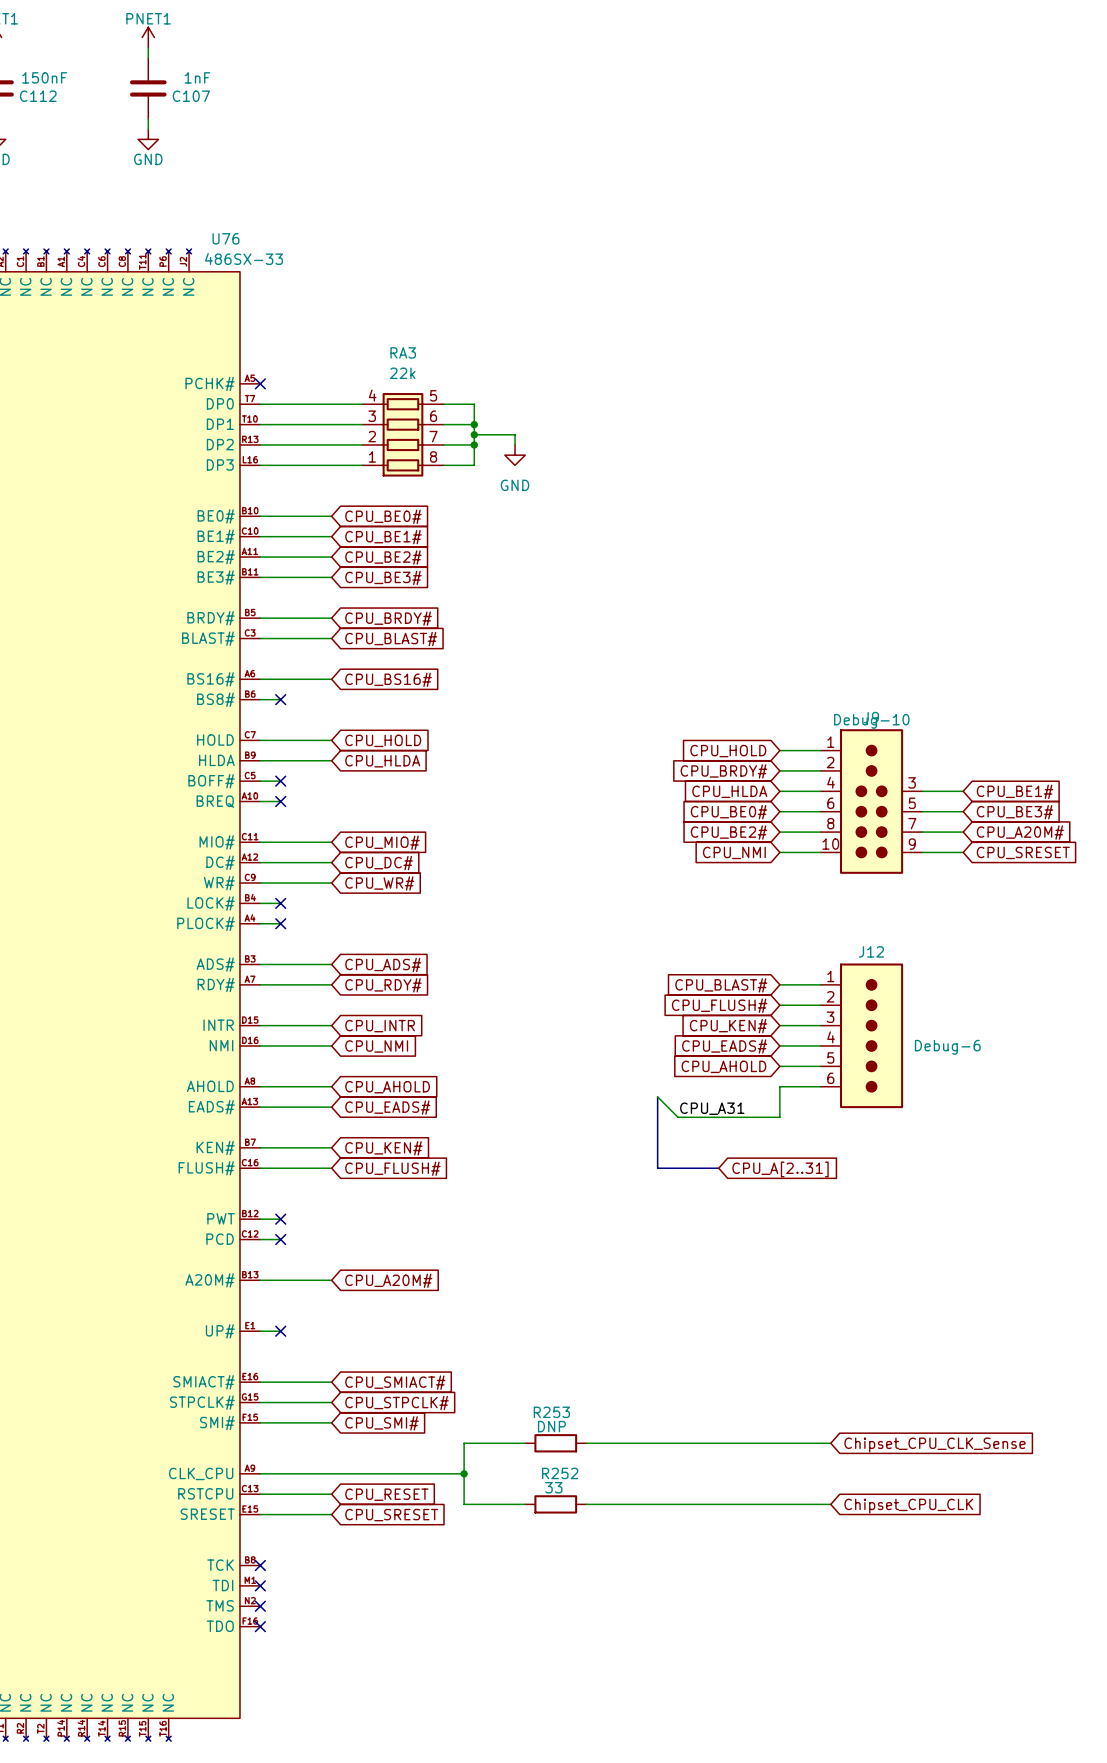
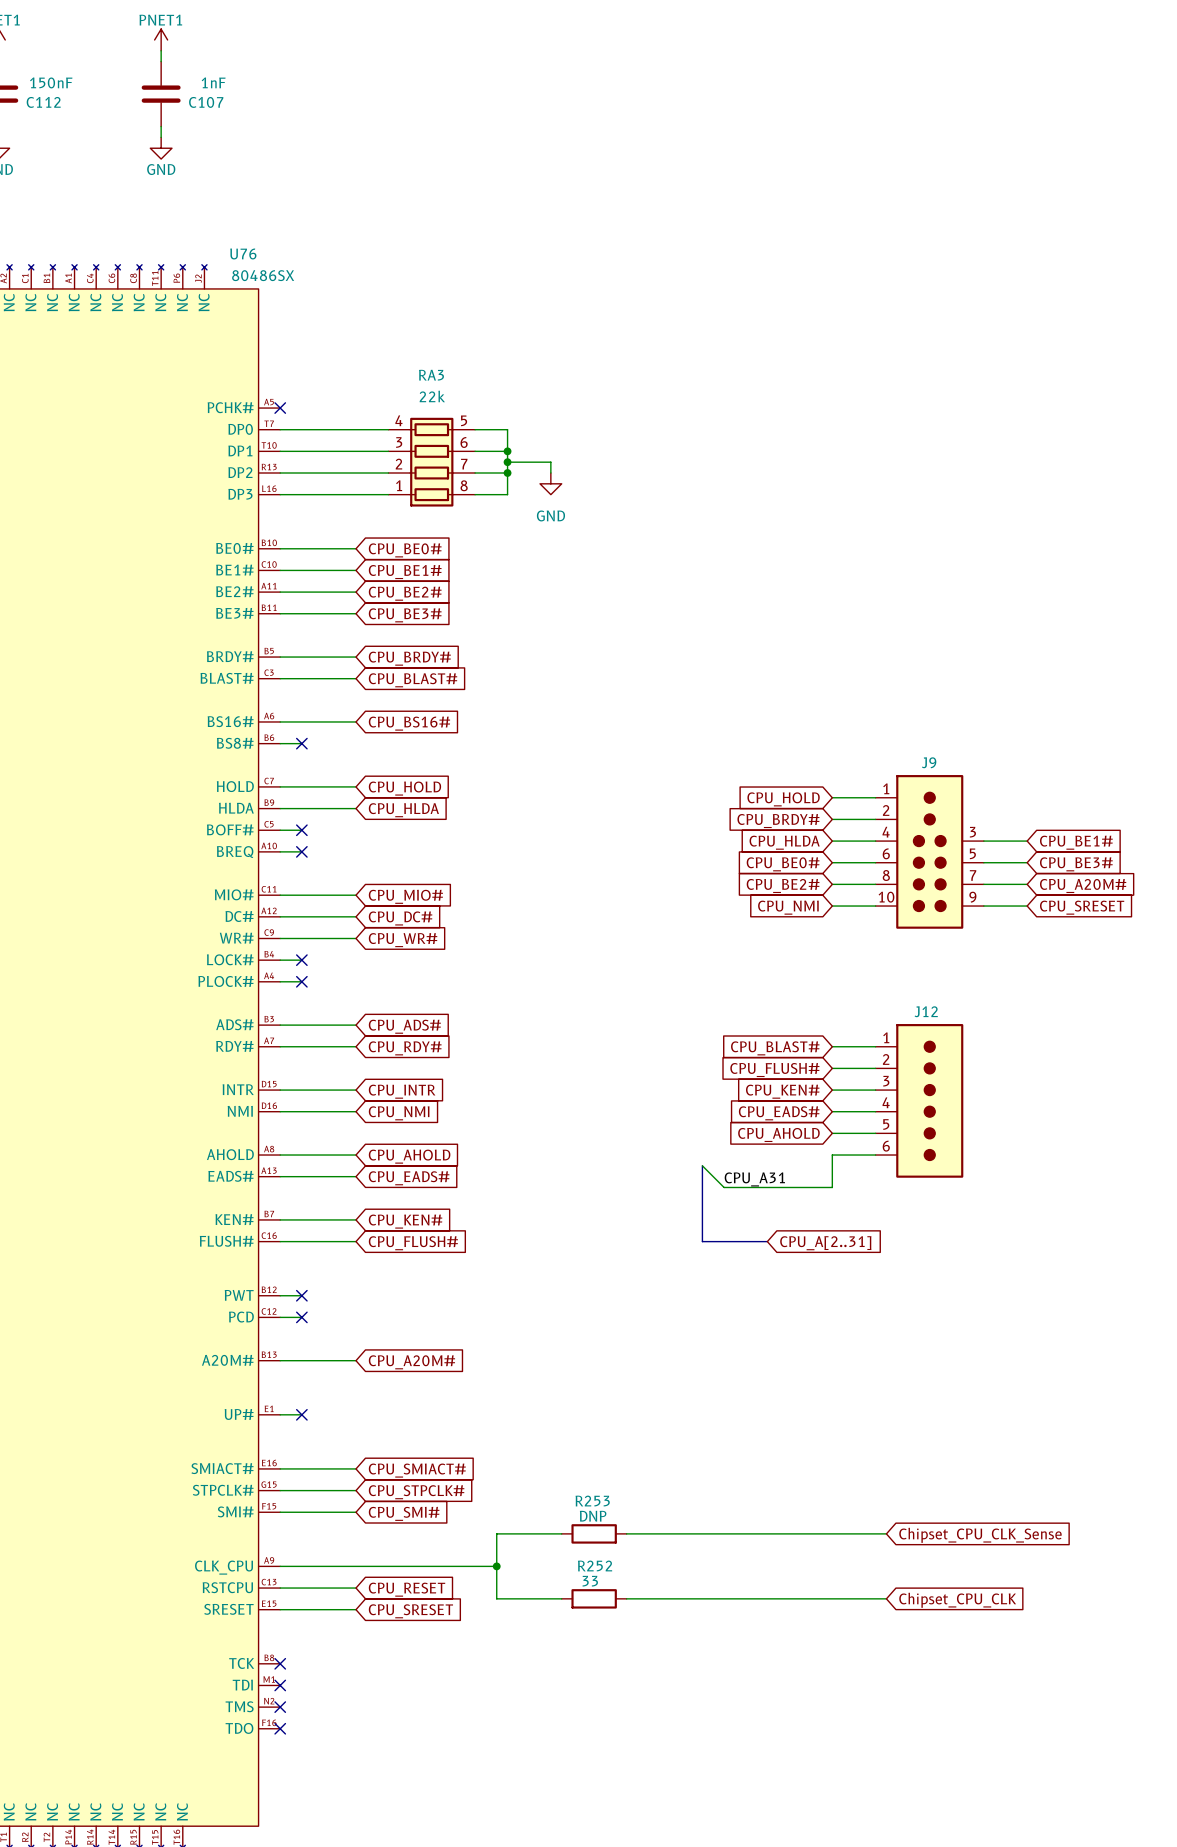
U76 value: 486SX-33 (244, 258) -> 80486SX (263, 275)
J9 value: Debug-10 (871, 721) -> none
J12 value: Debug-6 (947, 1047) -> none

